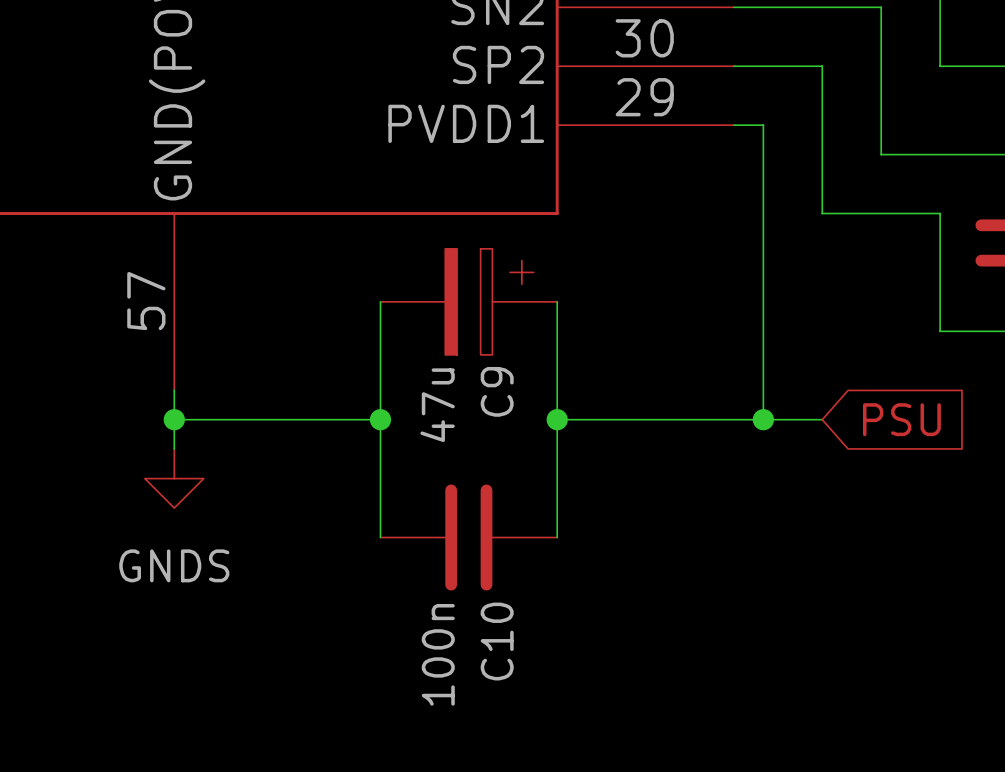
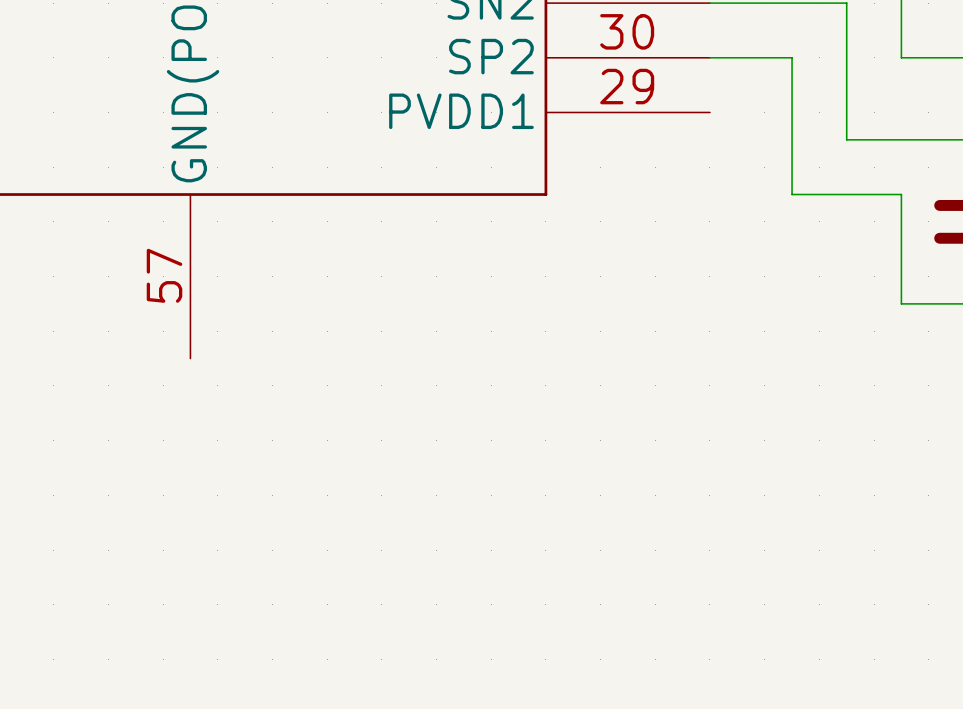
wire: (733, 125) (763, 125) (763, 419) -> none
wire: (380, 301) (380, 537) -> none
C9: 47u (468, 301) -> none
wire: (557, 301) (557, 537) -> none
wire: (174, 390) (174, 449) -> none
wire: (174, 419) (380, 419) -> none
junction: (174, 419) -> none
junction: (380, 419) -> none
wire: (557, 419) (822, 419) -> none
junction: (557, 419) -> none
junction: (763, 419) -> none
global label: PSU (901, 419) -> none
power symbol: GNDS (174, 478) -> none
C10: 100n (468, 537) -> none

